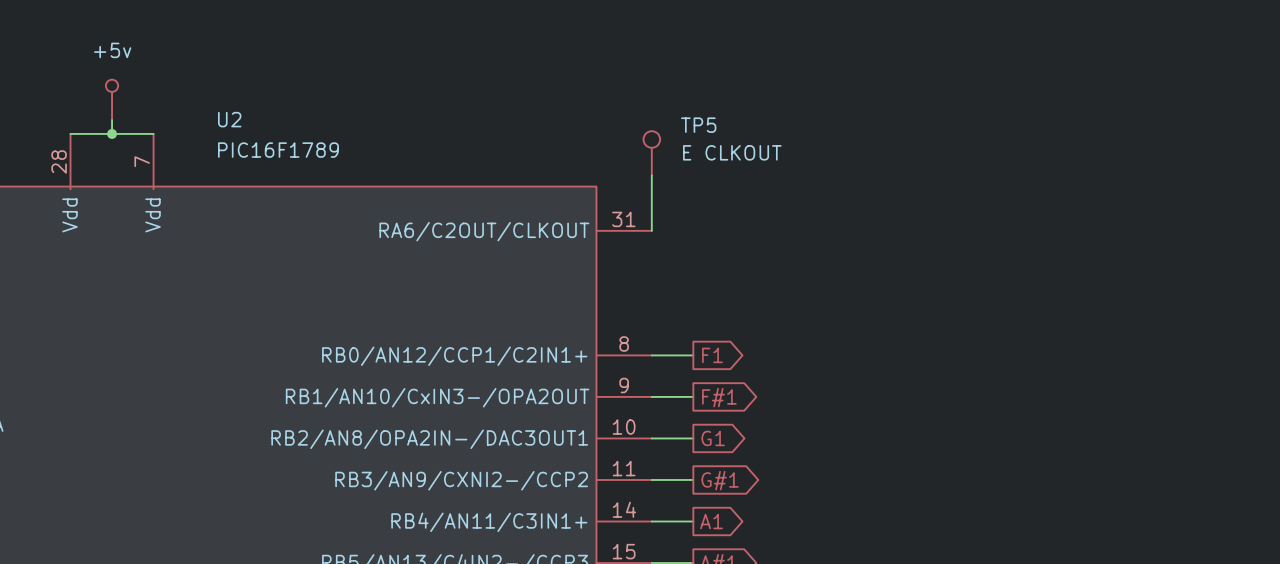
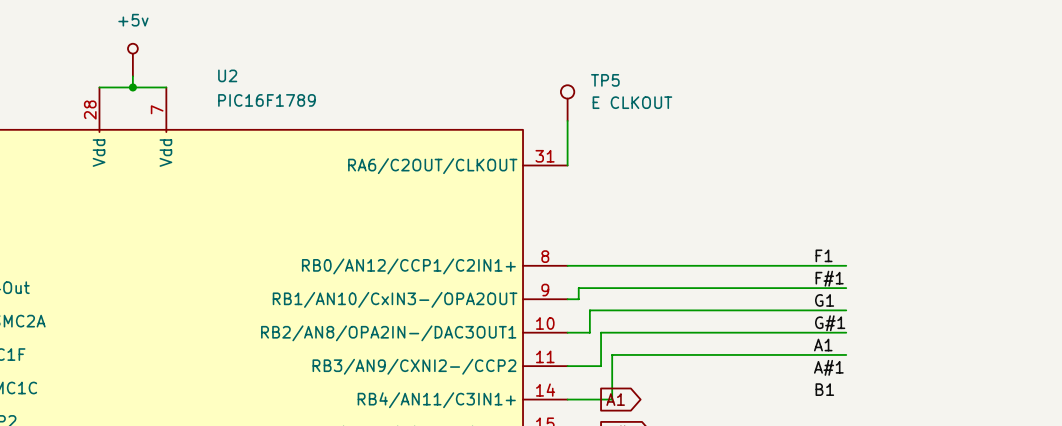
label: none -> F1 (824, 255)
wire: none -> (601, 265) (846, 265)
global label: F1 (712, 355) -> none
label: none -> F#1 (829, 278)
wire: (665, 396) (693, 396) -> (578, 299) (578, 288) (846, 288)
global label: F#1 (719, 397) -> none
label: none -> G1 (824, 300)
label: none -> G#1 (830, 323)
wire: (679, 438) (693, 438) -> (589, 332) (589, 310) (846, 310)
global label: G1 (713, 438) -> none
wire: none -> (846, 332) (601, 332) (601, 366)
label: none -> A1 (823, 345)
wire: none -> (846, 354) (612, 354) (612, 399) (601, 399)
global label: G#1 (720, 480) -> none
label: none -> A#1 (828, 367)
label: none -> B1 (824, 389)

